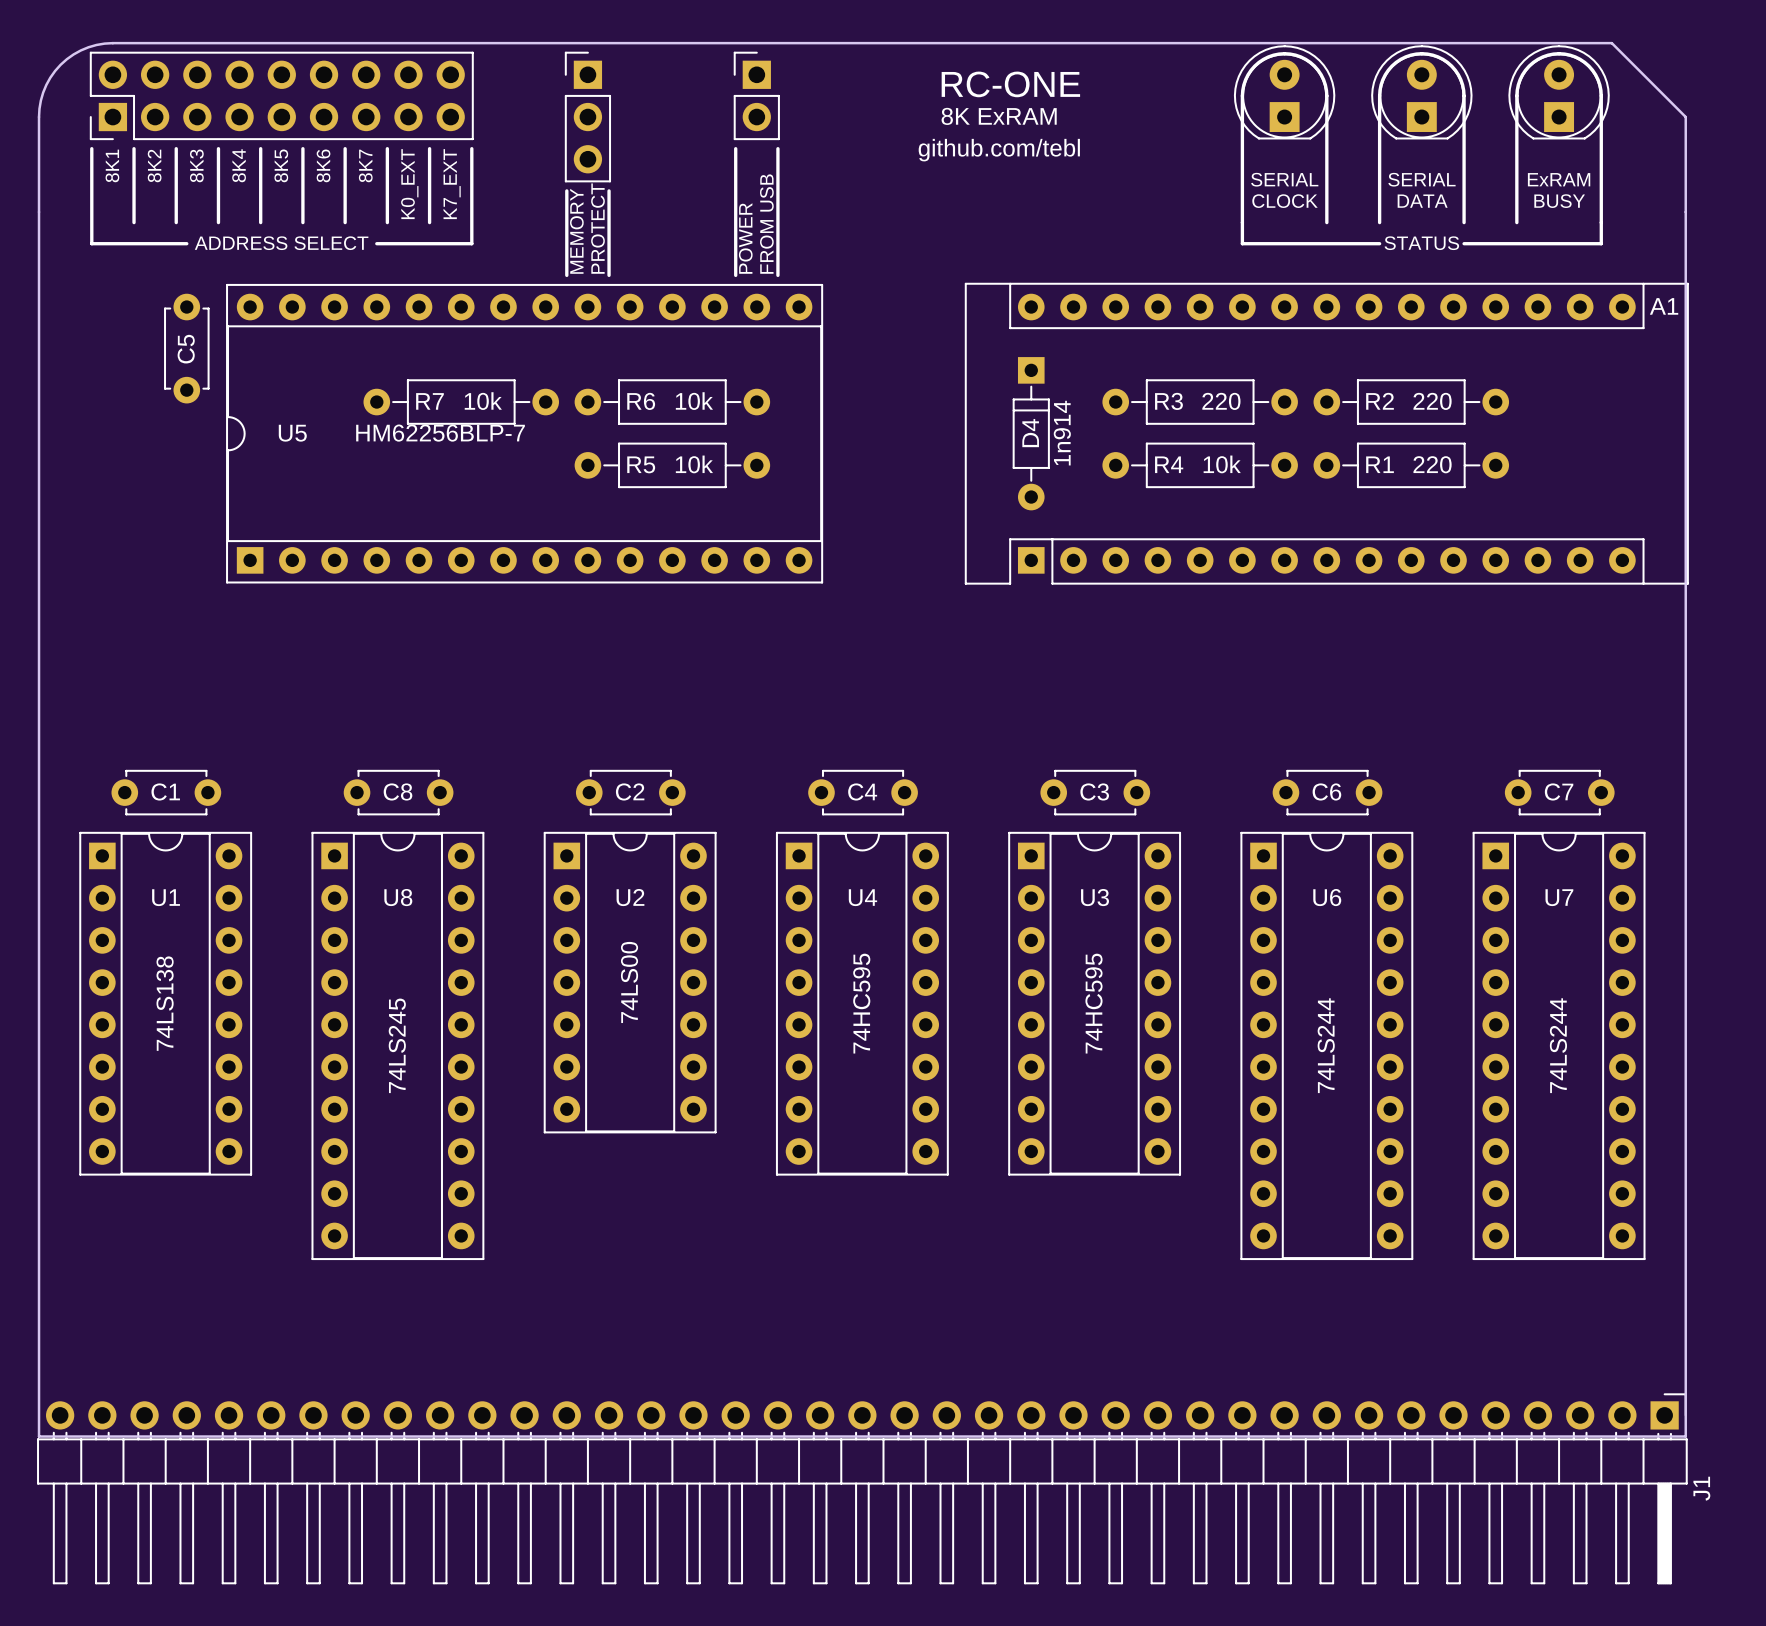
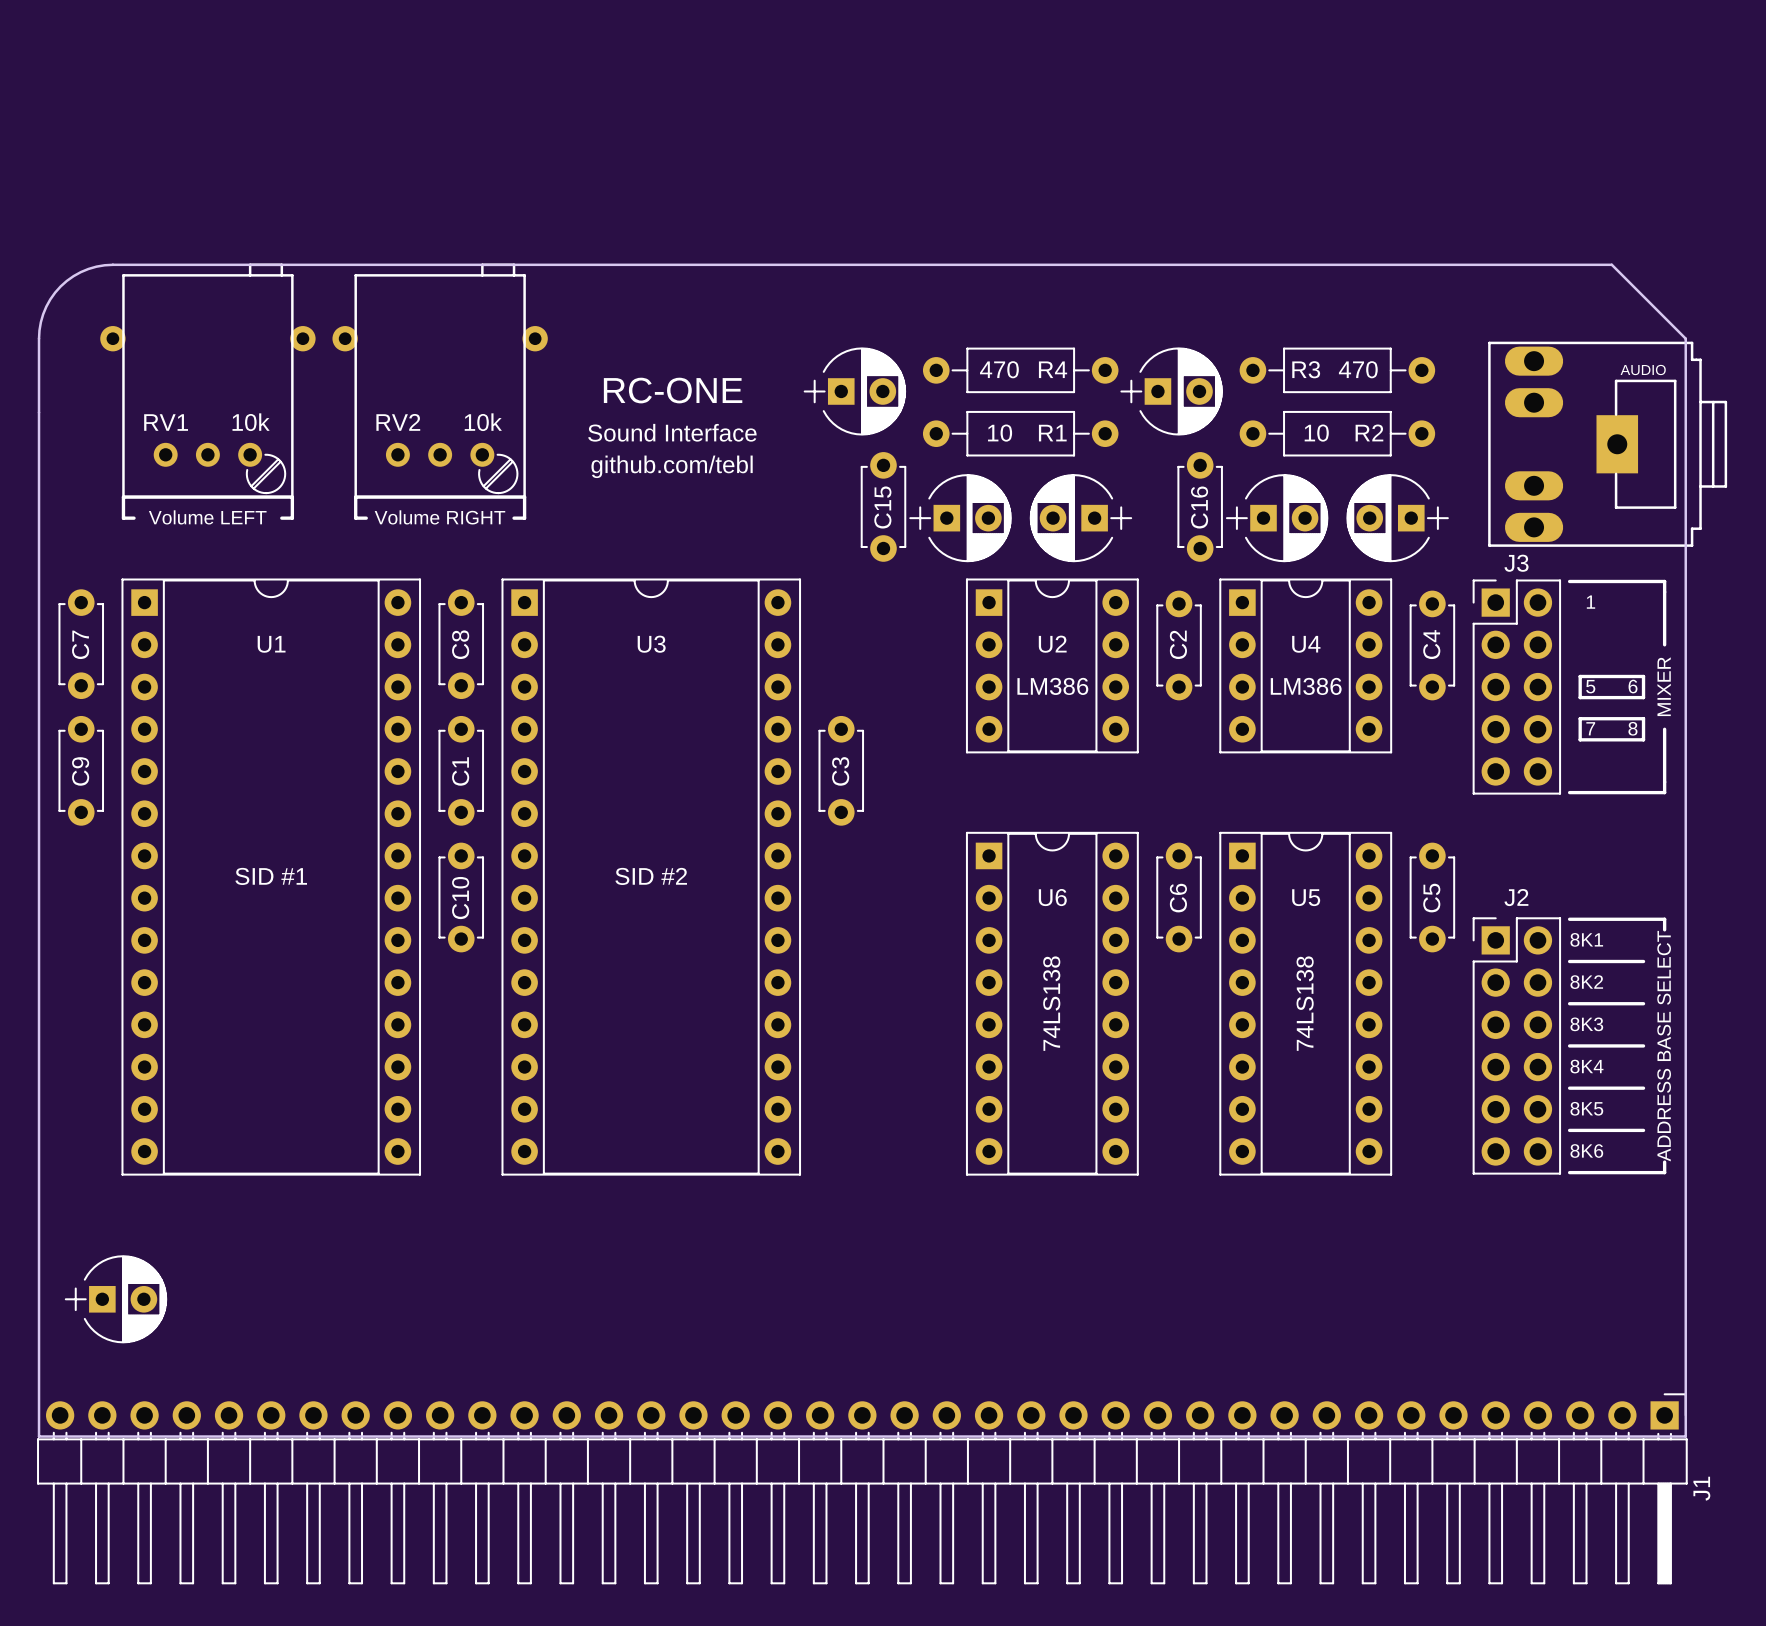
line: (1284, 53) (1268, 56) (1258, 62) (1248, 74) (1243, 84) (1242, 243) (1379, 243) -> none
line: (1284, 53) (1295, 55) (1310, 62) (1321, 74) (1325, 84) (1326, 222) -> none
text: RC-ONE (1010, 84) -> none
part: (1284, 92) -> none
part: (1421, 92) -> none
part: (1559, 92) -> none
part: (281, 95) -> none
part: (756, 95) -> none
text: 8K ExRAM (999, 116) -> none
part: (587, 117) -> none
line: (91, 148) (91, 243) (186, 243) -> none
line: (134, 148) (134, 222) -> none
line: (176, 148) (176, 222) -> none
line: (218, 148) (218, 222) -> none
line: (260, 148) (260, 222) -> none
line: (302, 148) (302, 222) -> none
line: (345, 148) (345, 222) -> none
line: (387, 148) (387, 222) -> none
line: (429, 148) (429, 222) -> none
line: (471, 148) (471, 243) (376, 243) -> none
line: (735, 148) (735, 275) -> none
line: (777, 148) (777, 275) -> none
text: github.com/tebl (999, 150) -> none
text: 8K1 (112, 165) -> none
text: 8K2 (154, 165) -> none
text: 8K3 (196, 165) -> none
text: 8K4 (239, 165) -> none
text: 8K5 (281, 165) -> none
text: 8K6 (323, 165) -> none
text: 8K7 (365, 165) -> none
text: SERIAL (1284, 179) -> none
text: SERIAL (1421, 179) -> none
text: ExRAM (1559, 179) -> none
text: K0_EXT (409, 184) -> none
text: K7_EXT (452, 184) -> none
line: (566, 190) (566, 275) -> none
line: (609, 190) (609, 275) -> none
text: CLOCK (1285, 201) -> none
text: DATA (1422, 201) -> none
text: BUSY (1559, 201) -> none
line: (1379, 222) (1381, 84) (1385, 74) (1396, 62) (1410, 55) (1421, 53) (1432, 55) (1447, 62) (1458, 74) (1462, 84) (1464, 222) -> none
line: (1516, 222) (1518, 84) (1525, 70) (1537, 59) (1553, 54) (1570, 55) (1584, 62) (1592, 70) (1600, 90) (1601, 243) (1464, 243) -> none
text: FROM USB (766, 224) -> none
text: PROTECT (597, 228) -> none
text: MEMORY (576, 231) -> none
text: POWER (745, 238) -> none
text: ADDRESS SELECT (281, 243) -> none
text: STATUS (1421, 243) -> none
U5 footprint: [226, 283, 824, 584] -> [1219, 831, 1393, 1176]
board edge: (39, 338) (39, 117) (40, 100) (50, 77) (60, 64) (73, 54) (96, 44) (112, 43) (1611, 43) (1685, 117) (1685, 338) -> (39, 338) (43, 314) (50, 299) (60, 286) (73, 276) (88, 268) (112, 264) (1611, 264) (1685, 338)
C5 position: (186, 348) -> (1432, 897)
RV1: none -> 10k (207, 380)
RV2: none -> 10k (440, 380)
text: none -> RC-ONE (673, 390)
part: none -> (854, 391)
part: none -> (1171, 391)
R3 value: 220 (1221, 401) -> 470 (1358, 369)
R2 name position: R2 (1380, 401) -> R2 (1369, 432)
R2 value: 220 (1432, 401) -> 10 (1316, 433)
R7: 10k (461, 402) -> none
R6: 10k (672, 402) -> none
R3 position: (1200, 402) -> (1337, 370)
R2 position: (1411, 402) -> (1337, 433)
text: none -> Sound Interface (672, 432)
U5 name position: U5 (292, 433) -> U5 (1306, 897)
U5 value: HM62256BLP-7 (440, 433) -> 74LS138 (1305, 1003)
D4: 1n914 (1031, 433) -> none
A1: (1326, 433) -> none
part: none -> AUDIO (1607, 444)
R4 name position: R4 (1169, 464) -> R4 (1053, 369)
R4 value: 10k (1222, 464) -> 470 (999, 369)
R1 name position: R1 (1380, 464) -> R1 (1052, 433)
R1 value: 220 (1432, 464) -> 10 (1000, 433)
R5: 10k (672, 465) -> none
R4 position: (1200, 465) -> (1020, 370)
R1 position: (1411, 465) -> (1020, 433)
text: none -> github.com/tebl (672, 466)
C15: none -> (883, 506)
C16: none -> (1200, 506)
text: none -> Volume LEFT (207, 517)
text: none -> Volume RIGHT (439, 517)
line: none -> (134, 518) (123, 518) (123, 497) (292, 497) (292, 518) (281, 518)
line: none -> (366, 518) (355, 518) (355, 497) (524, 497) (524, 518) (514, 518)
part: none -> (960, 518)
part: none -> (1080, 518)
part: none -> (1277, 518)
part: none -> (1397, 518)
line: none -> (1569, 581) (1664, 581) (1664, 644)
text: none -> 1 (1591, 602)
line: none -> (1580, 676) (1580, 697) (1643, 697) (1643, 676) (1580, 676)
text: none -> 5 (1590, 686)
text: none -> 6 (1633, 686)
text: none -> MIXER (1664, 686)
J3: none -> (1516, 687)
line: none -> (1580, 718) (1643, 718) (1643, 739) (1580, 739) (1580, 718)
text: none -> 7 (1590, 728)
text: none -> 8 (1632, 728)
line: none -> (1664, 729) (1664, 792) (1569, 792)
C9: none -> (81, 770)
C1 rotation: 0° (166, 792) -> 90° clockwise (461, 770)
C1 position: (166, 792) -> (461, 770)
C8 rotation: 0° (398, 792) -> 90° clockwise (461, 644)
C8 position: (398, 792) -> (461, 644)
C2 rotation: 0° (630, 792) -> 90° clockwise (1179, 645)
C2 position: (630, 792) -> (1179, 645)
C4 rotation: 0° (863, 792) -> 90° clockwise (1432, 645)
C4 position: (863, 792) -> (1432, 645)
C3 rotation: 0° (1095, 792) -> 90° clockwise (841, 770)
C3 position: (1095, 792) -> (841, 770)
C6 rotation: 0° (1327, 792) -> 90° clockwise (1179, 897)
C6 position: (1327, 792) -> (1179, 897)
C7 rotation: 0° (1559, 792) -> 90° clockwise (81, 644)
C7 position: (1559, 792) -> (81, 644)
U1 footprint: [79, 831, 253, 1176] -> [121, 578, 422, 1176]
U2 footprint: [543, 831, 717, 1134] -> [965, 578, 1139, 754]
U4 footprint: [775, 831, 949, 1176] -> [1219, 578, 1393, 754]
U3 footprint: [1008, 831, 1182, 1176] -> [501, 578, 802, 1176]
U6 footprint: [1240, 831, 1414, 1261] -> [965, 831, 1139, 1176]
U1 name position: U1 (166, 897) -> U1 (271, 644)
C10: none -> (461, 897)
U2 name position: U2 (630, 897) -> U2 (1052, 644)
U4 name position: U4 (862, 897) -> U4 (1306, 644)
U3 name position: U3 (1095, 897) -> U3 (651, 644)
U6 name position: U6 (1327, 897) -> U6 (1052, 897)
line: none -> (1569, 919) (1664, 919) (1664, 929)
text: none -> 8K1 (1586, 939)
line: none -> (1569, 961) (1643, 961)
U2 value: 74LS00 (629, 982) -> LM386 (1052, 686)
text: none -> 8K2 (1586, 982)
U1 value: 74LS138 (165, 1003) -> SID #1 (271, 876)
U4 value: 74HC595 (861, 1003) -> LM386 (1306, 686)
U3 value: 74HC595 (1093, 1003) -> SID #2 (651, 876)
line: none -> (1569, 1003) (1643, 1003)
text: none -> 8K3 (1586, 1024)
U8: 74LS245 (397, 1045) -> none
U6 value: 74LS244 (1326, 1045) -> 74LS138 (1051, 1003)
J2: none -> (1516, 1045)
U7: 74LS244 (1559, 1045) -> none
line: none -> (1569, 1045) (1643, 1045)
text: none -> ADDRESS BASE SELECT (1664, 1046)
text: none -> 8K4 (1586, 1066)
line: none -> (1569, 1088) (1643, 1088)
text: none -> 8K5 (1586, 1108)
line: none -> (1569, 1130) (1643, 1130)
text: none -> 8K6 (1586, 1151)
line: none -> (1664, 1162) (1664, 1172) (1569, 1172)
part: none -> (115, 1299)

